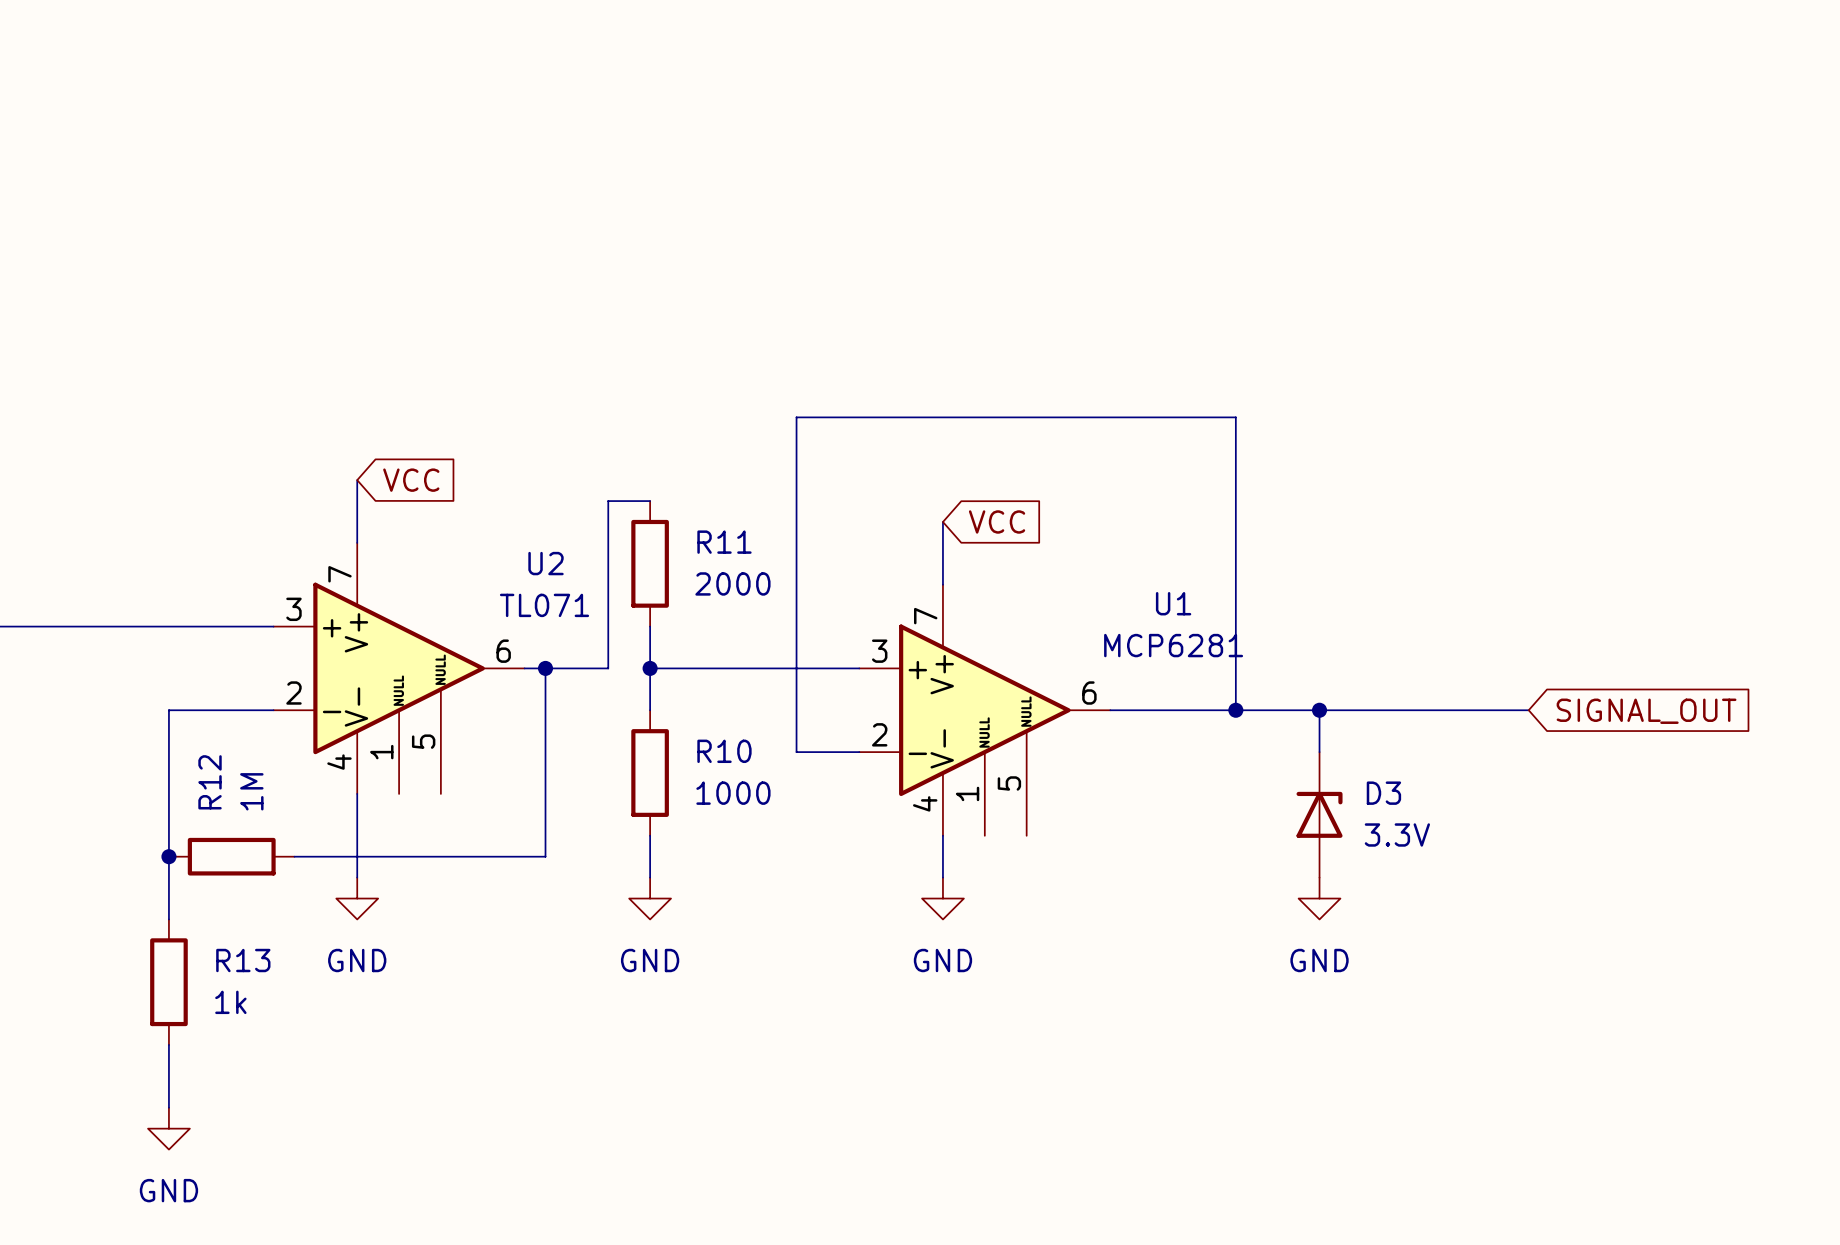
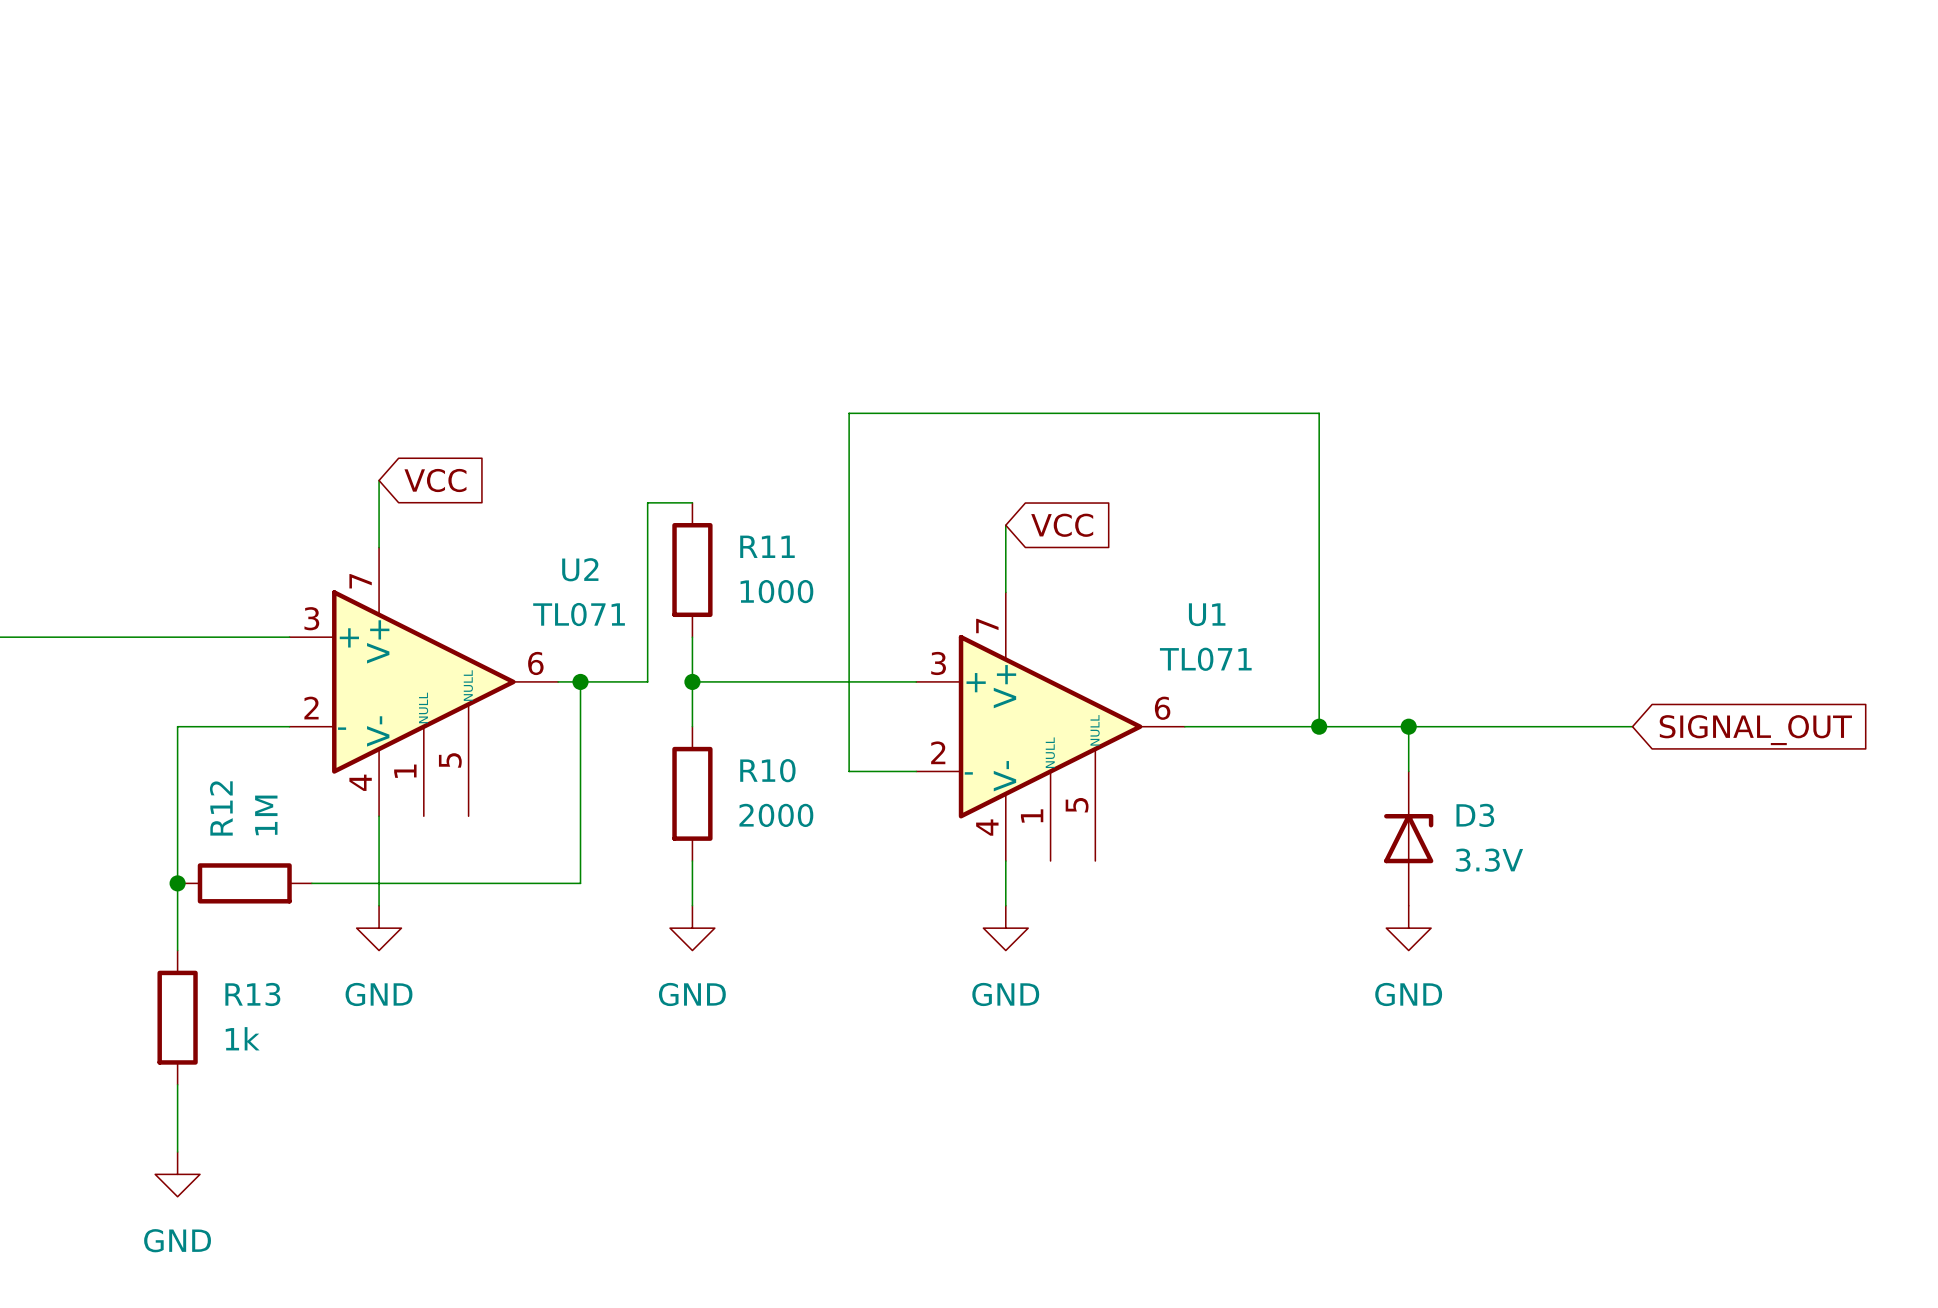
R11 value: 2000 (732, 583) -> 1000 (776, 591)
U1 name position: U1 (1173, 603) -> U1 (1207, 614)
U1 value: MCP6281 (1173, 645) -> TL071 (1205, 659)
R10 value: 1000 (733, 793) -> 2000 (776, 815)

